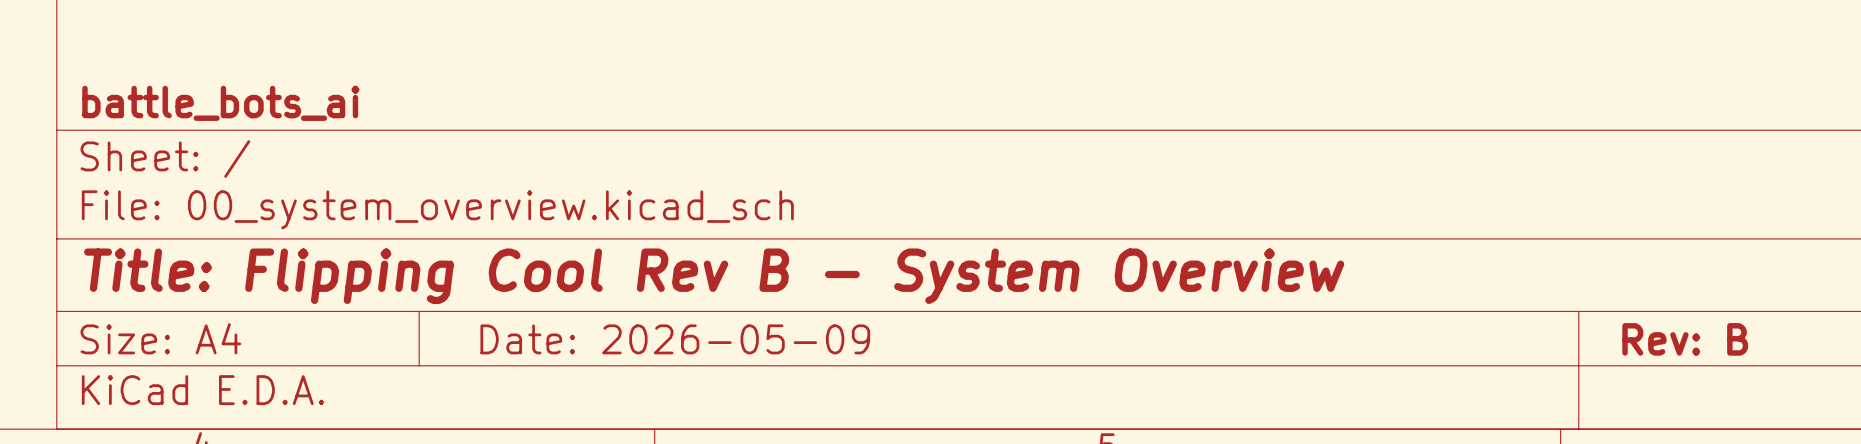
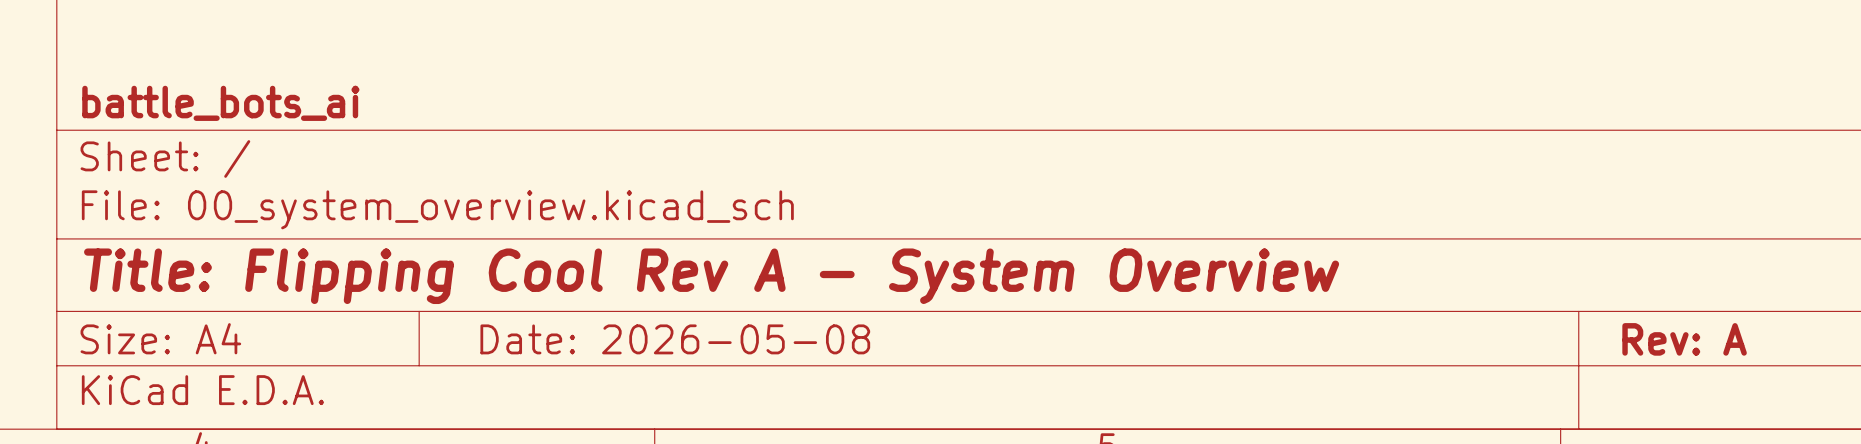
title block: Title: Flipping Cool Rev B - System Overview (714, 276) -> Title: Flipping Cool Rev A - System Overview (711, 276)
title block: Date: 2026-05-09 (675, 339) -> Date: 2026-05-08 (675, 339)
title block: Rev: B (1685, 339) -> Rev: A (1684, 339)

